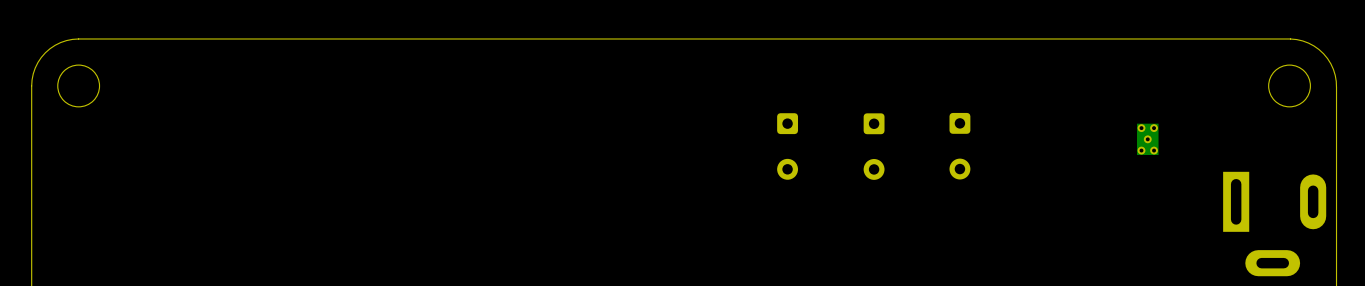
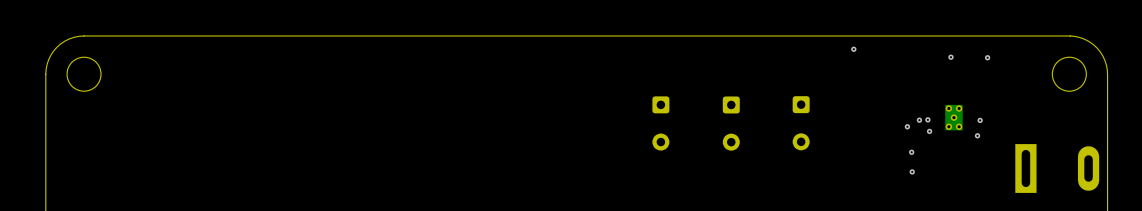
via: none -> (853, 49)
via: none -> (950, 57)
via: none -> (987, 57)
via: none -> (919, 120)
via: none -> (927, 119)
via: none -> (980, 120)
via: none -> (907, 126)
via: none -> (929, 131)
via: none -> (977, 135)
via: none -> (911, 152)
via: none -> (912, 171)

